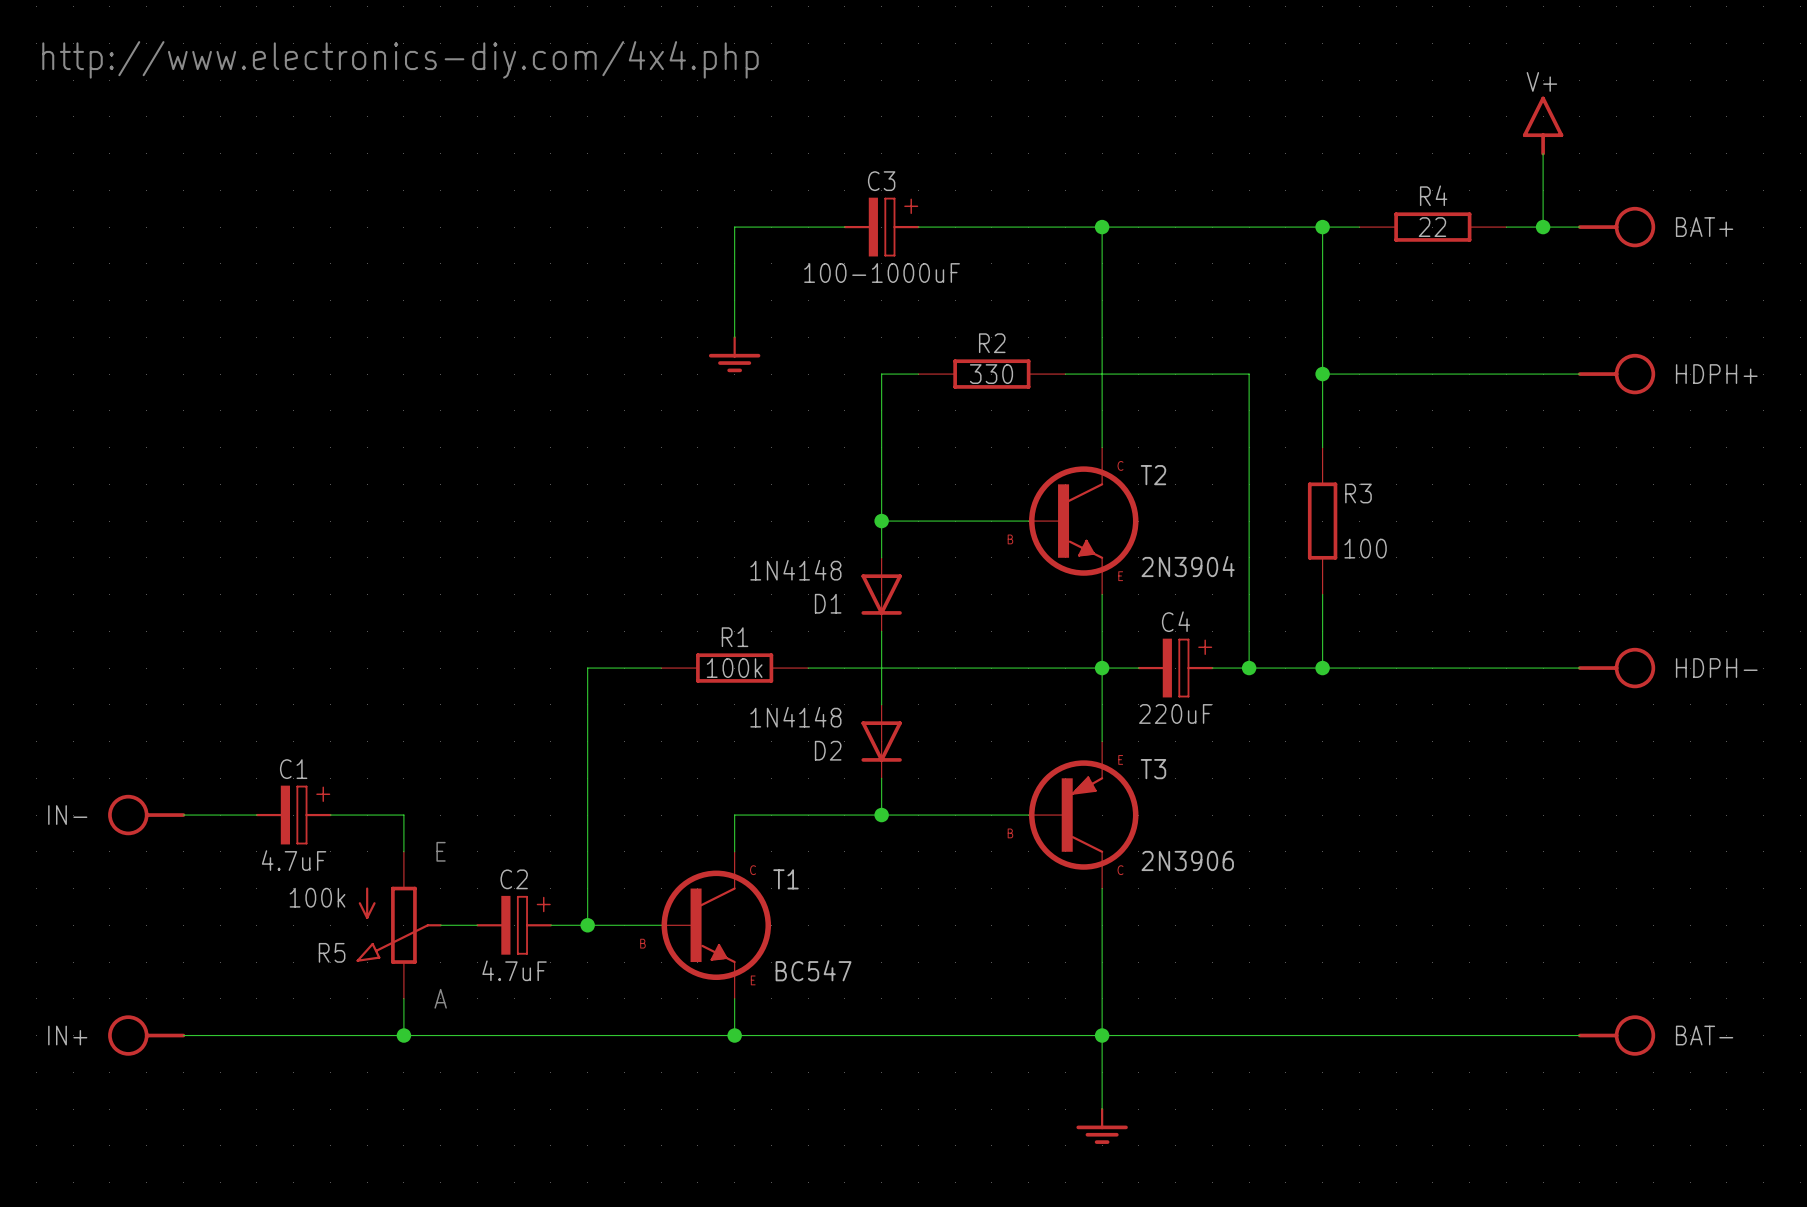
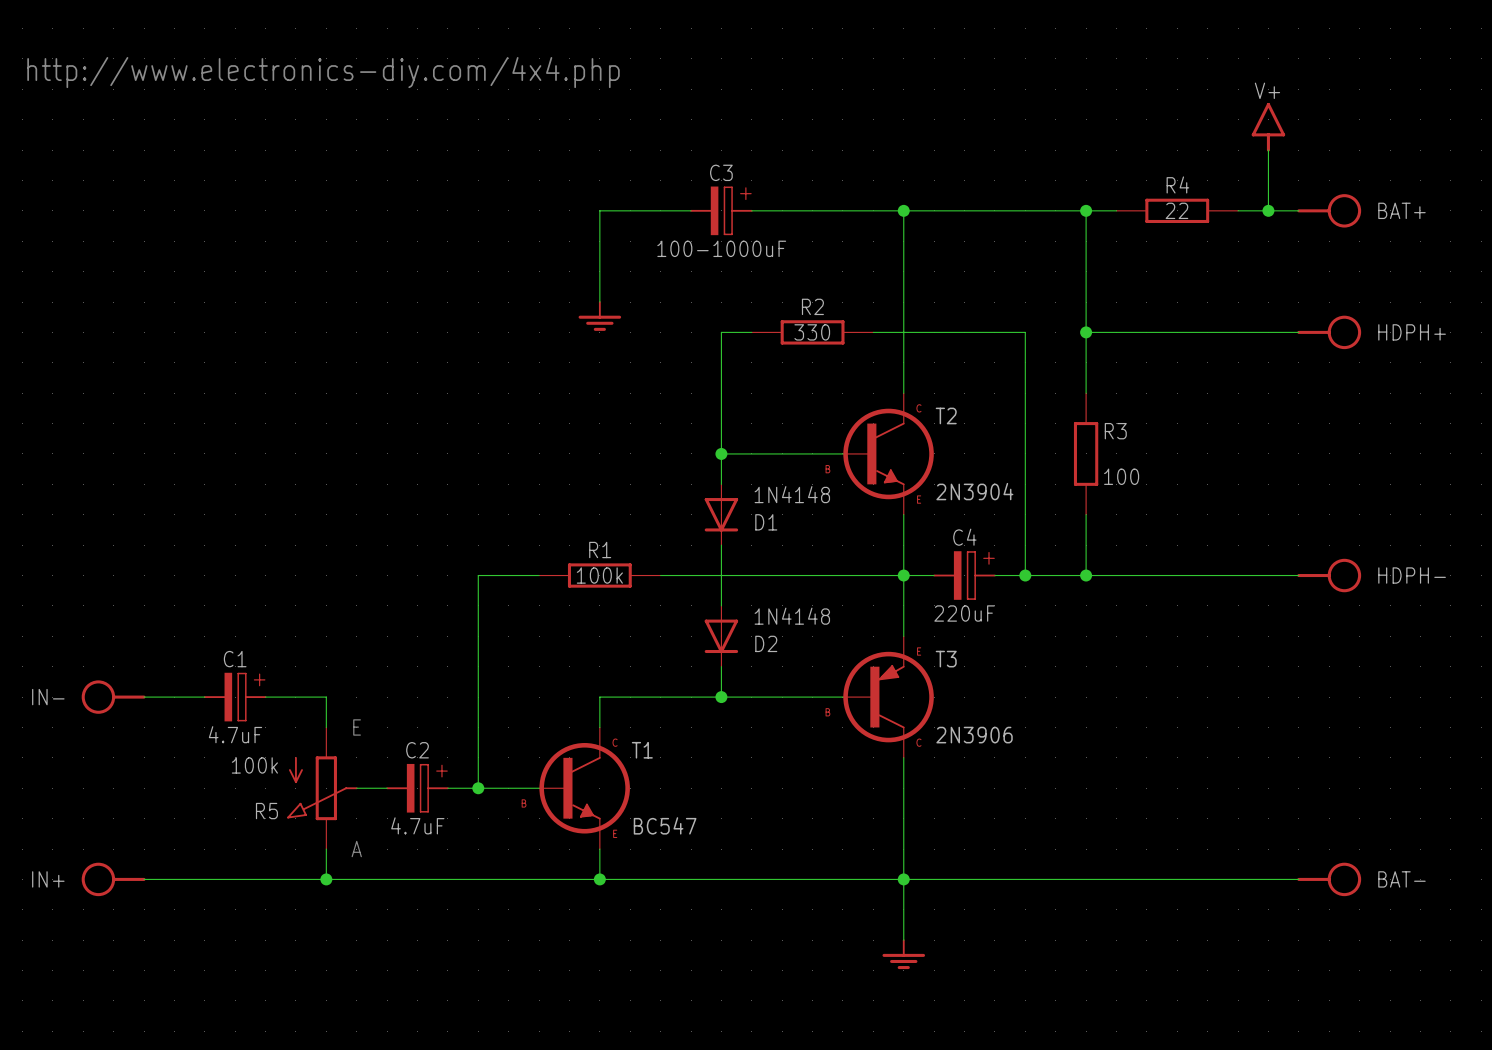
D1 value position: 1N4148 (795, 570) -> 1N4148 (792, 494)
D1 name position: D1 (828, 603) -> D1 (766, 522)
D2 value position: 1N4148 (795, 717) -> 1N4148 (792, 616)
D2 name position: D2 (828, 750) -> D2 (766, 643)

